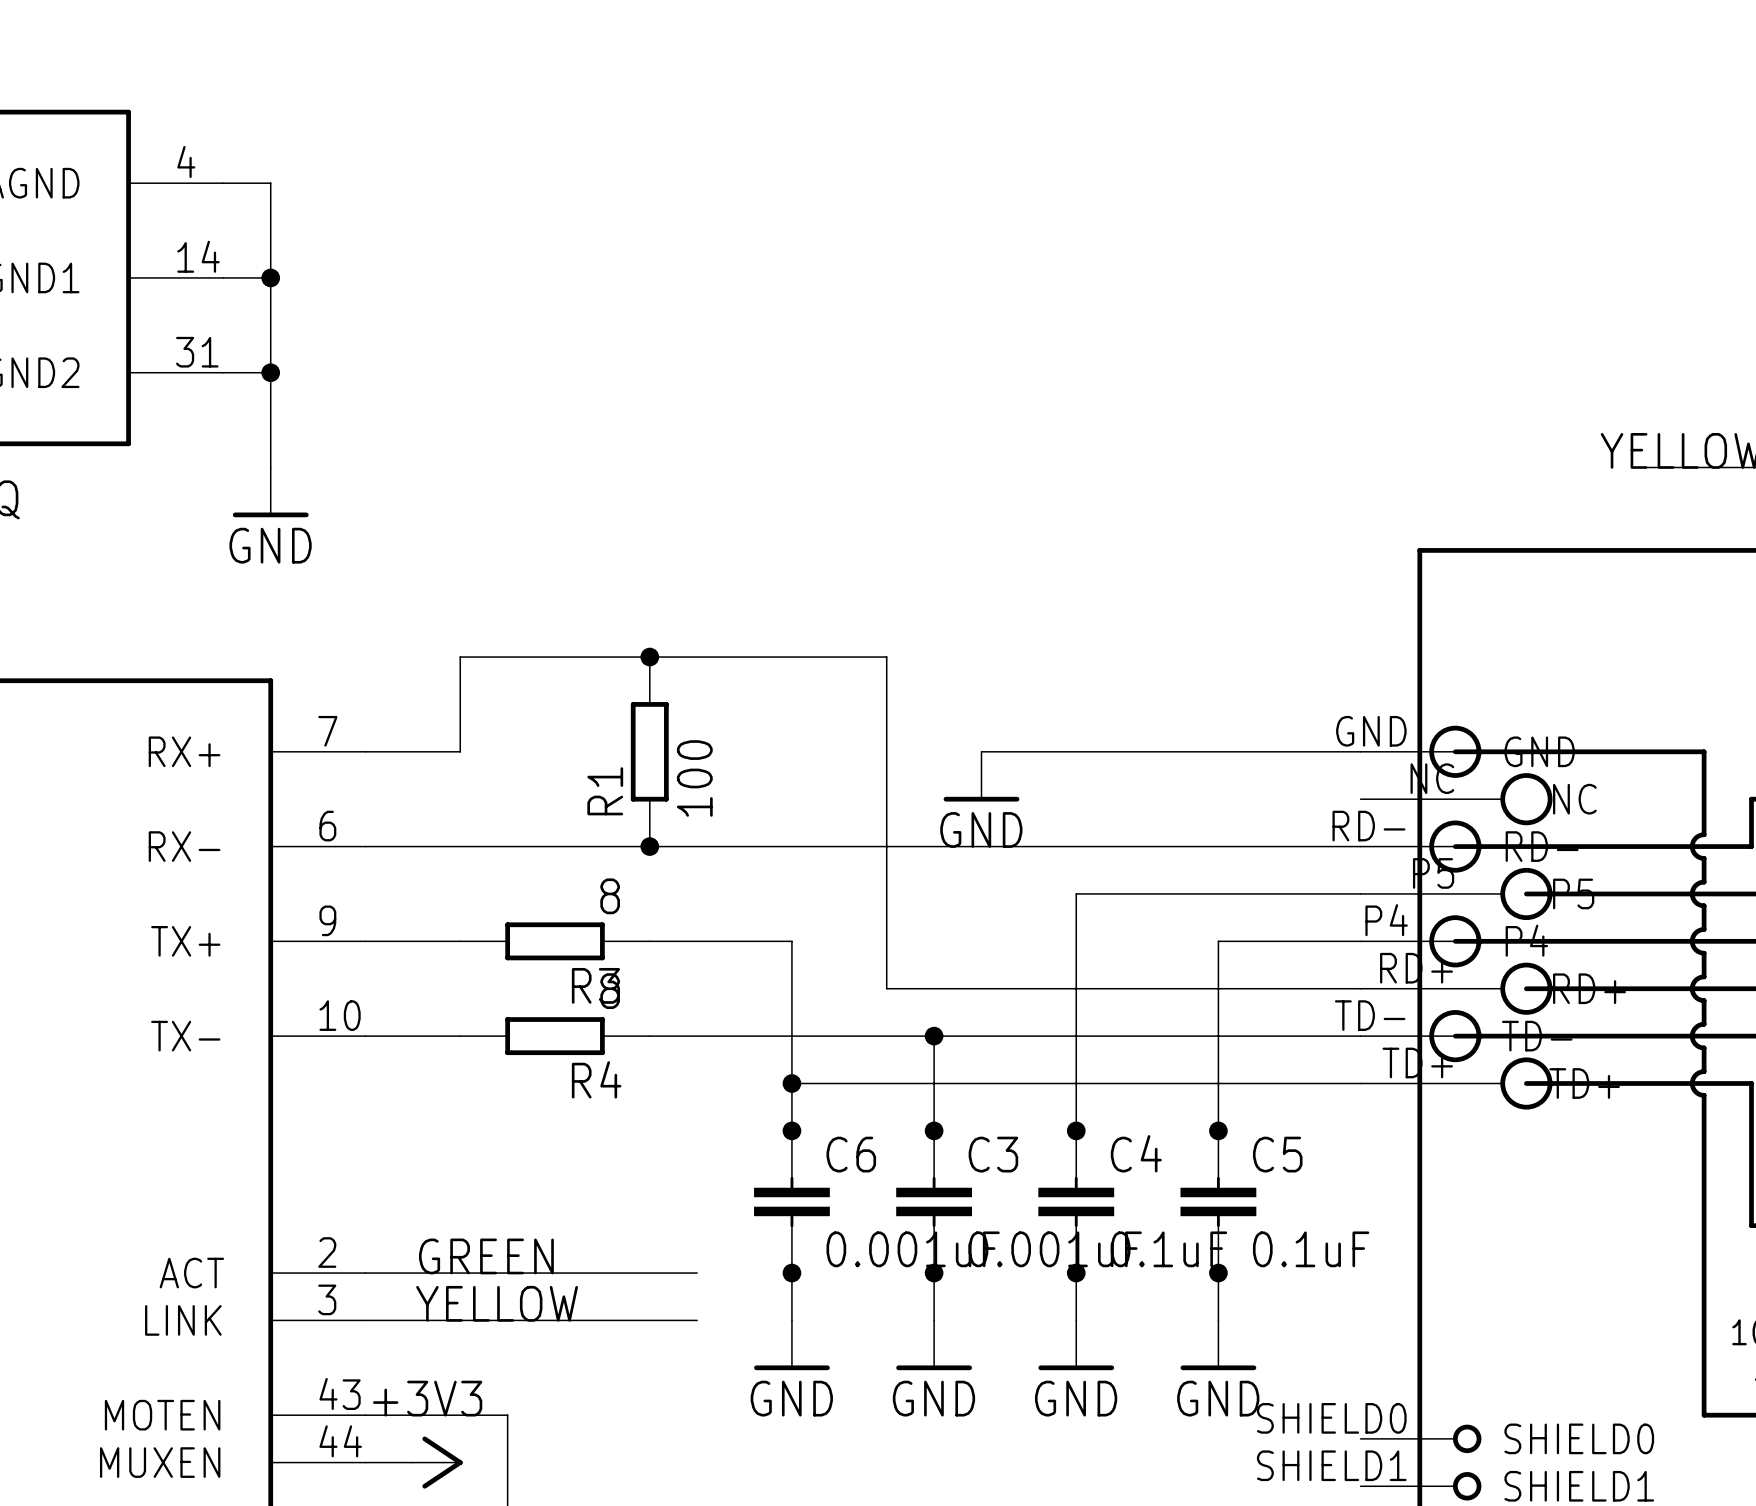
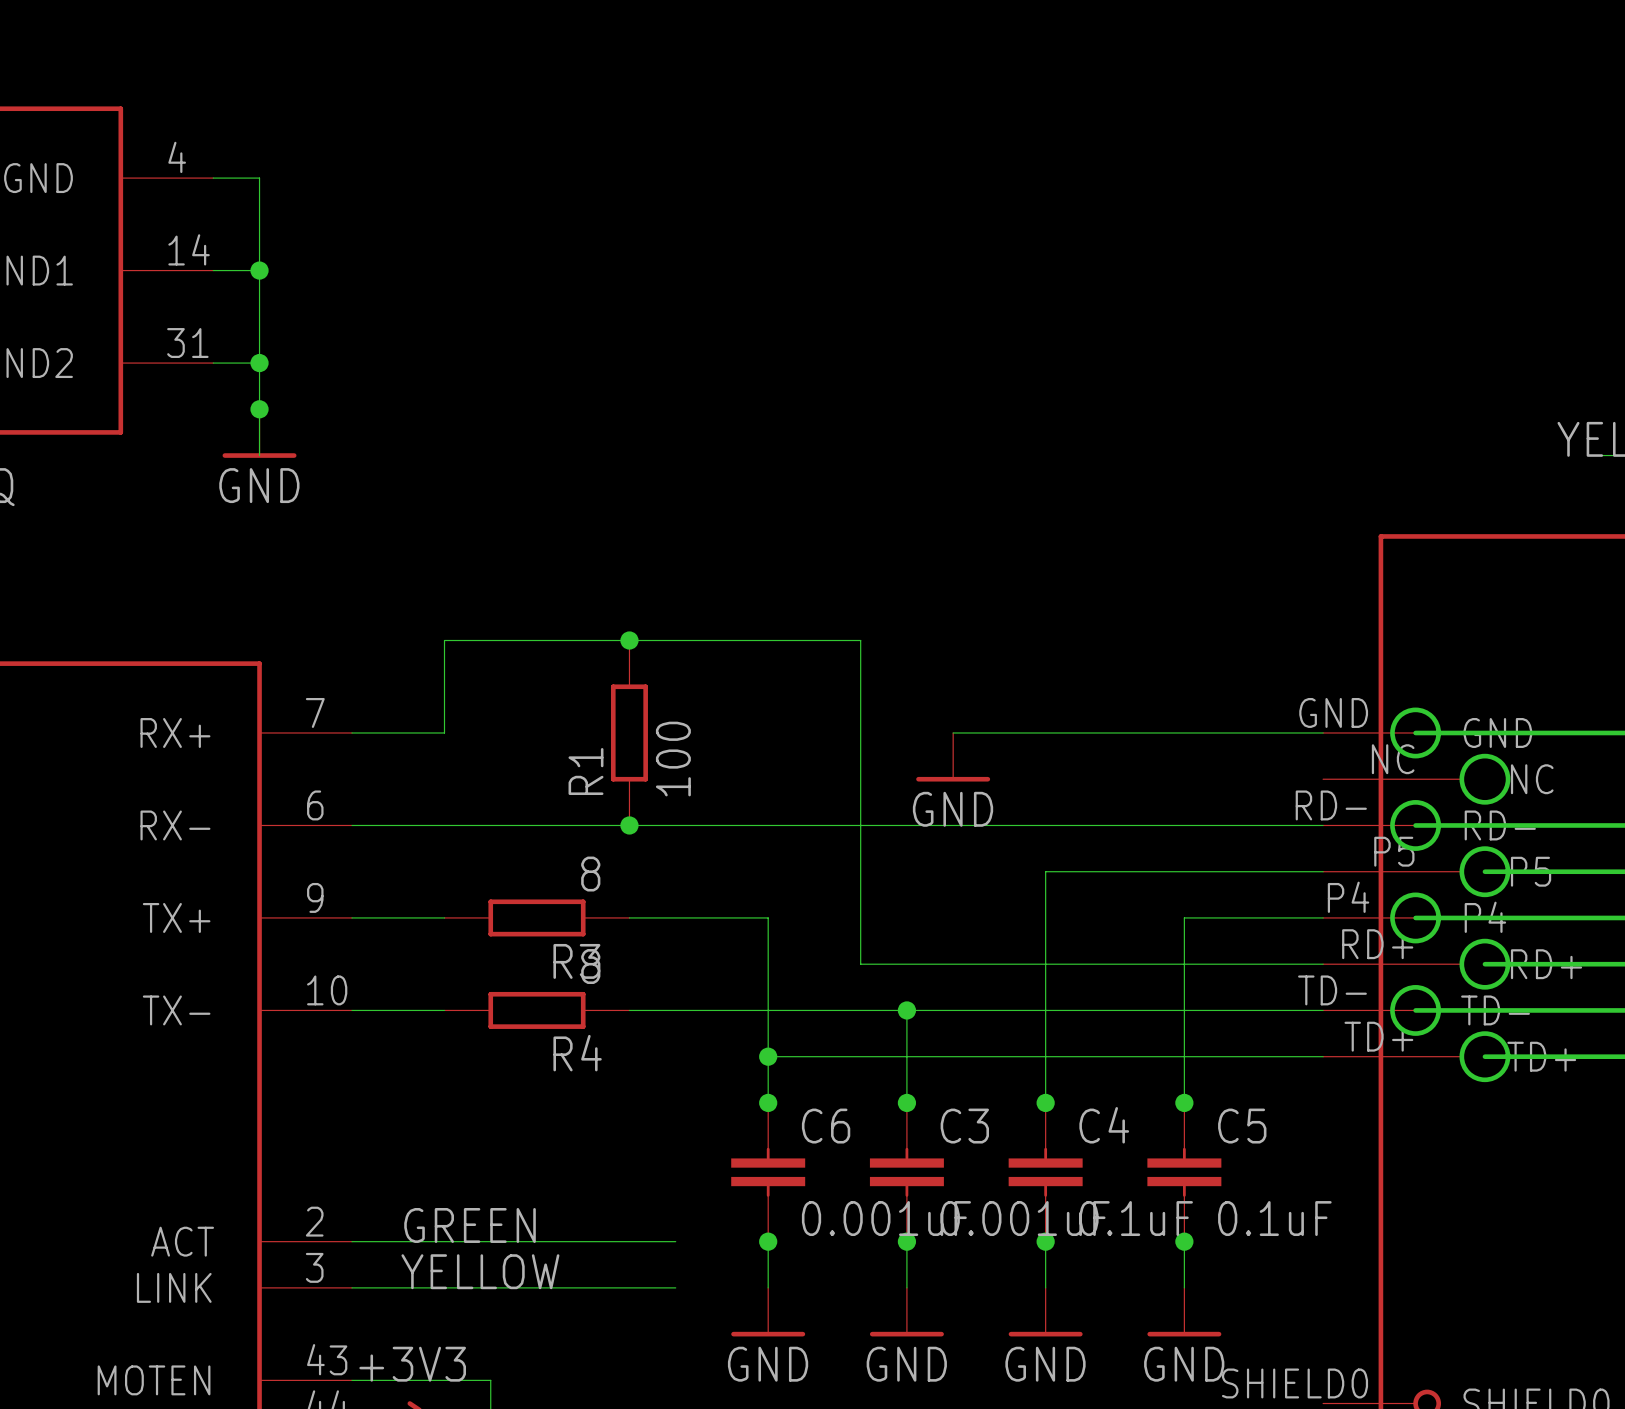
junction: none -> (259, 409)
power symbol position: GND (270, 492) -> GND (259, 433)

